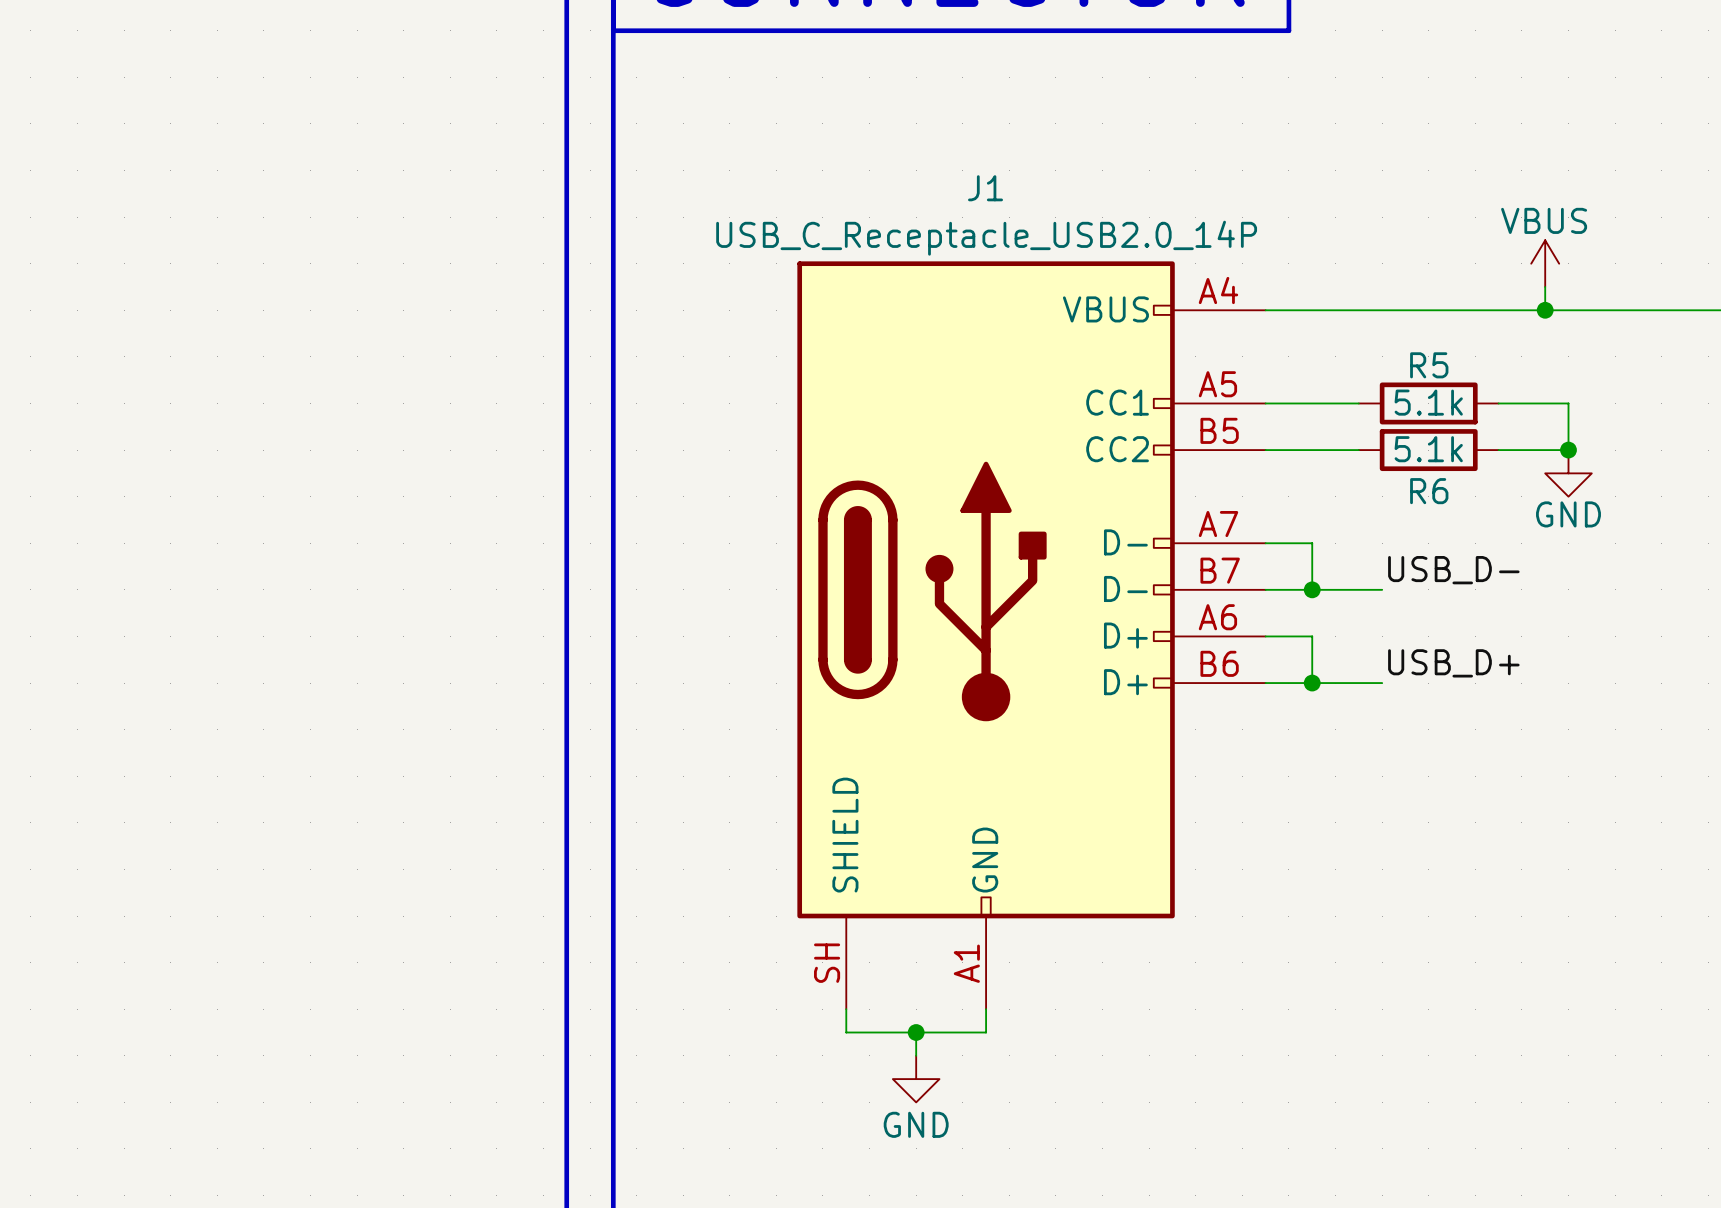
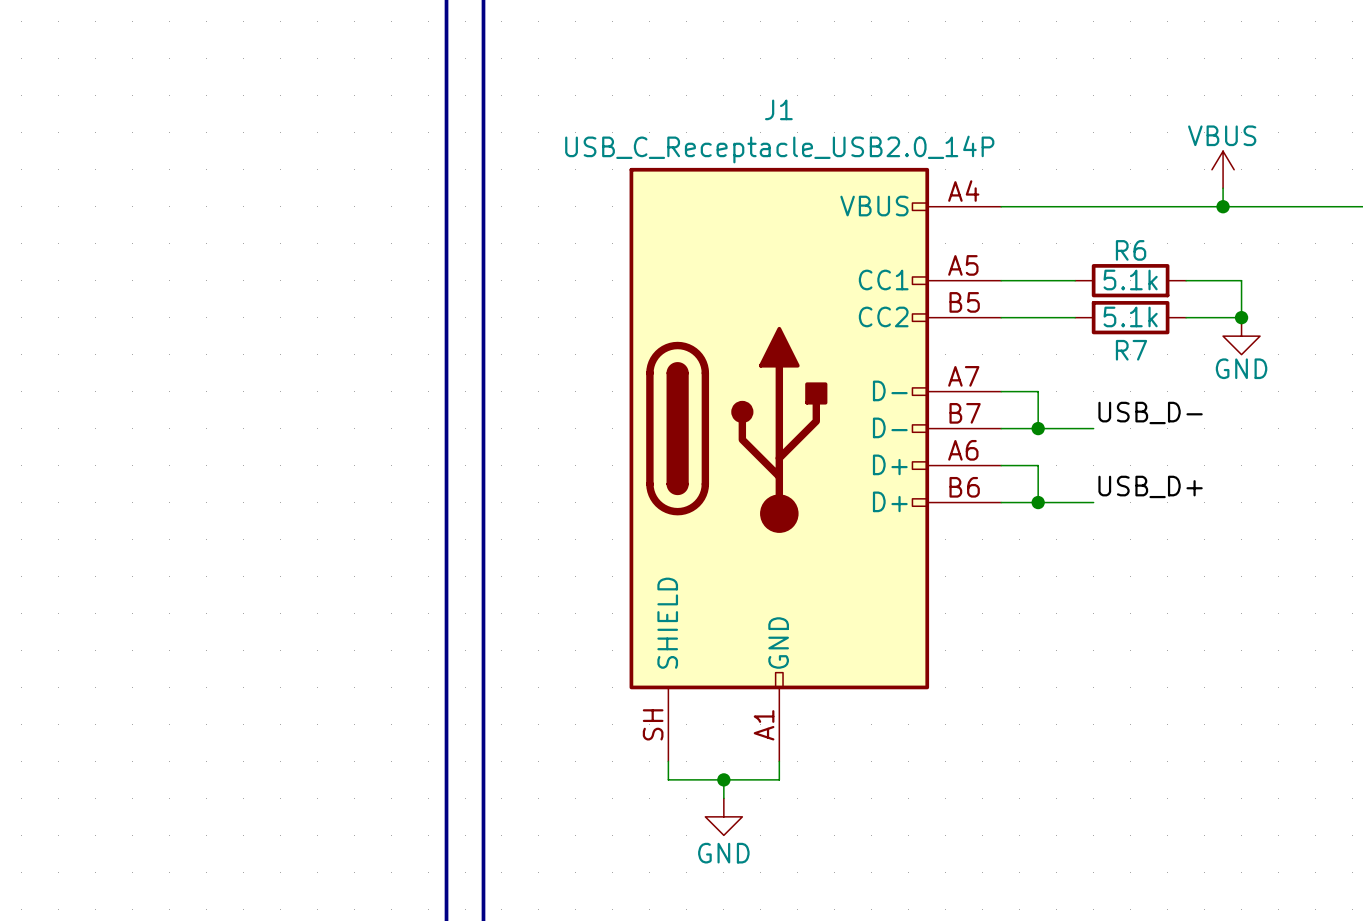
R5 name: R5 (1429, 365) -> R6 (1131, 250)
R6 name: R6 (1429, 491) -> R7 (1131, 350)

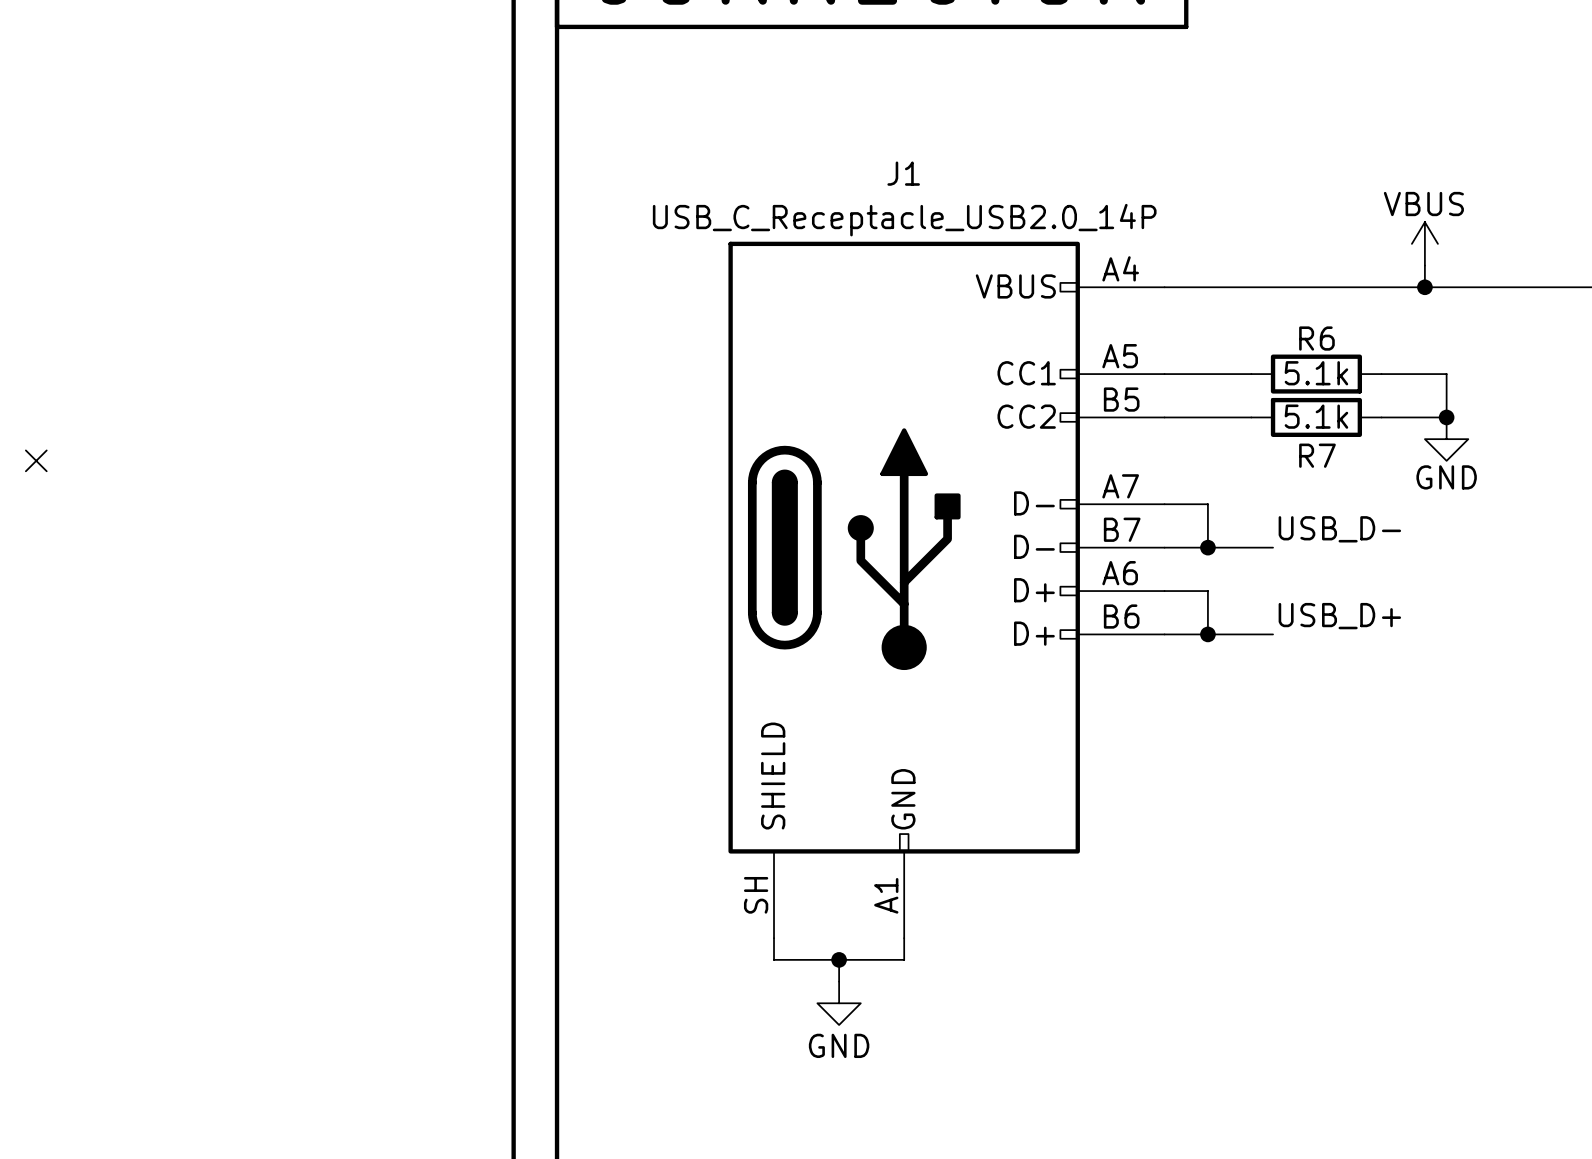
no-connect mark: none -> (36, 460)

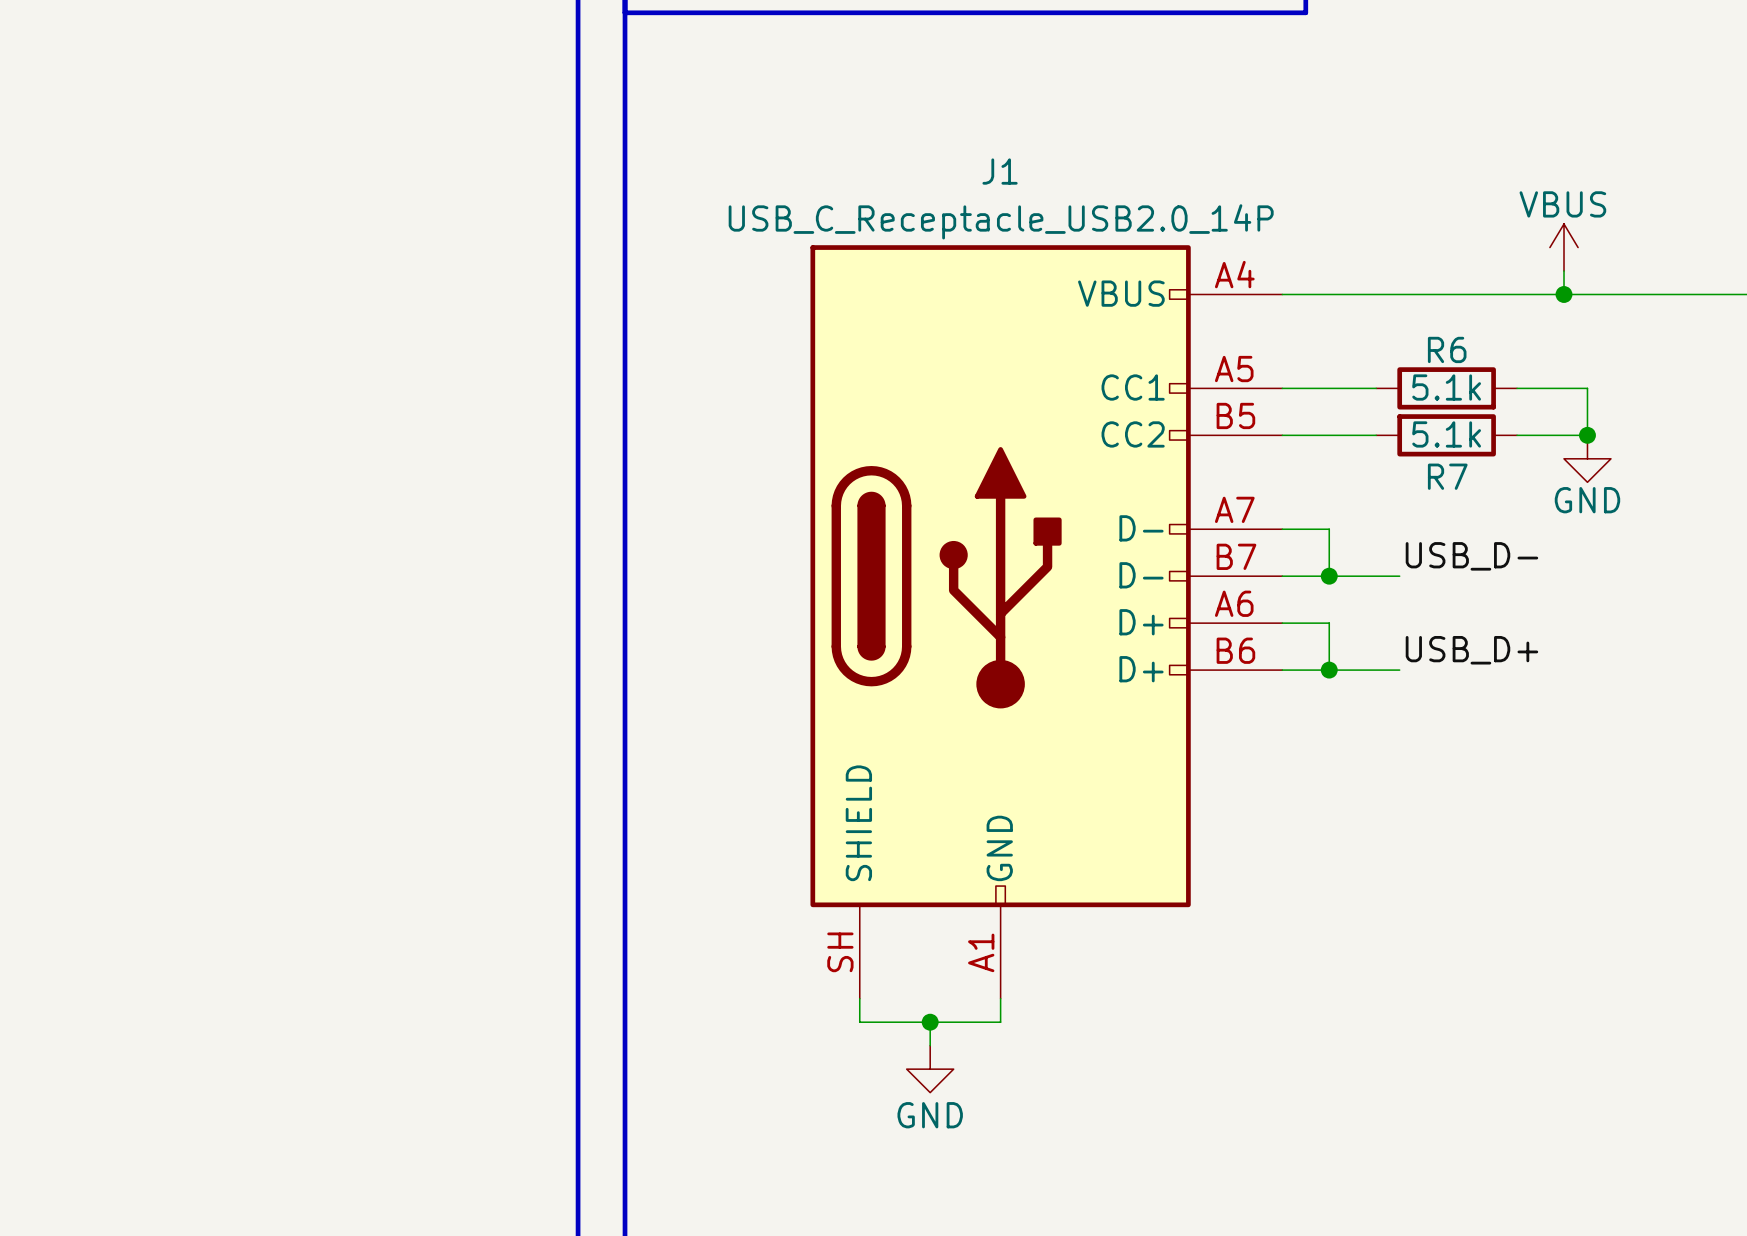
no-connect mark: (36, 460) -> none

